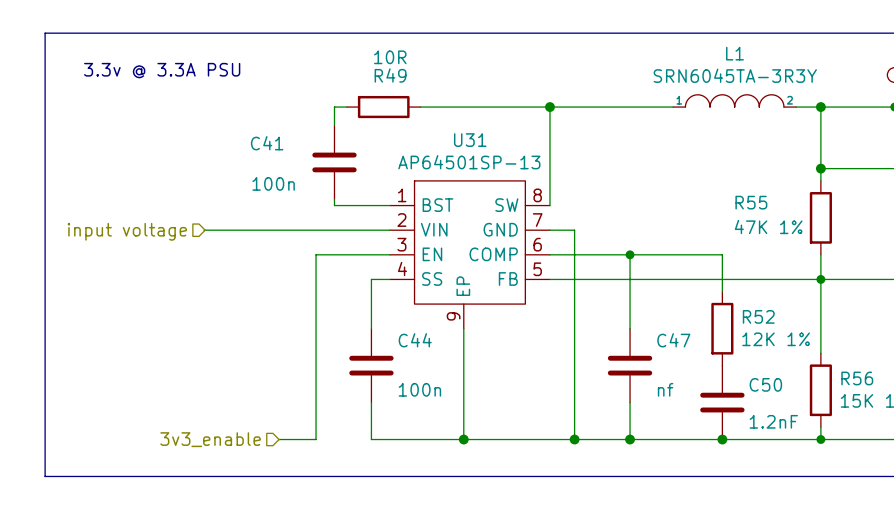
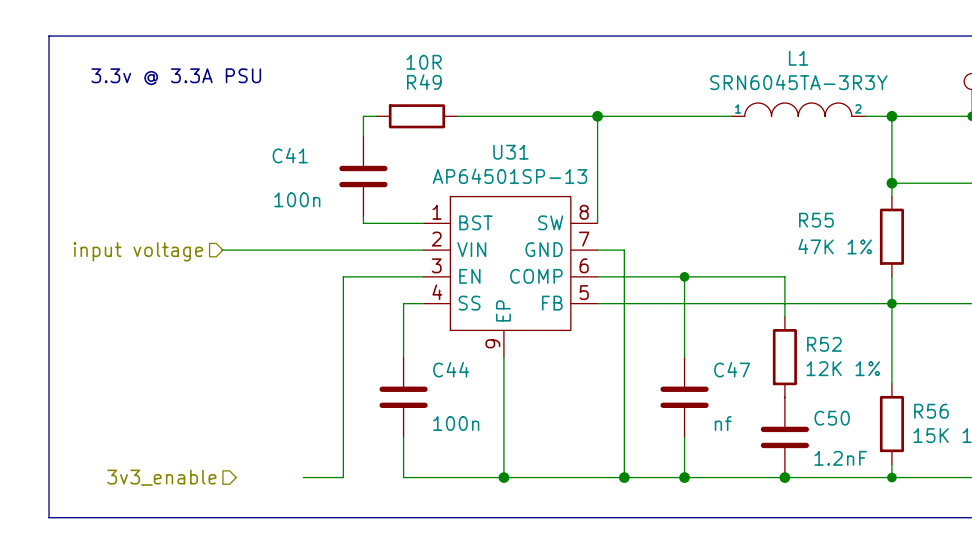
hierarchical label position: 3v3_enable (210, 439) -> 3v3_enable (161, 477)

